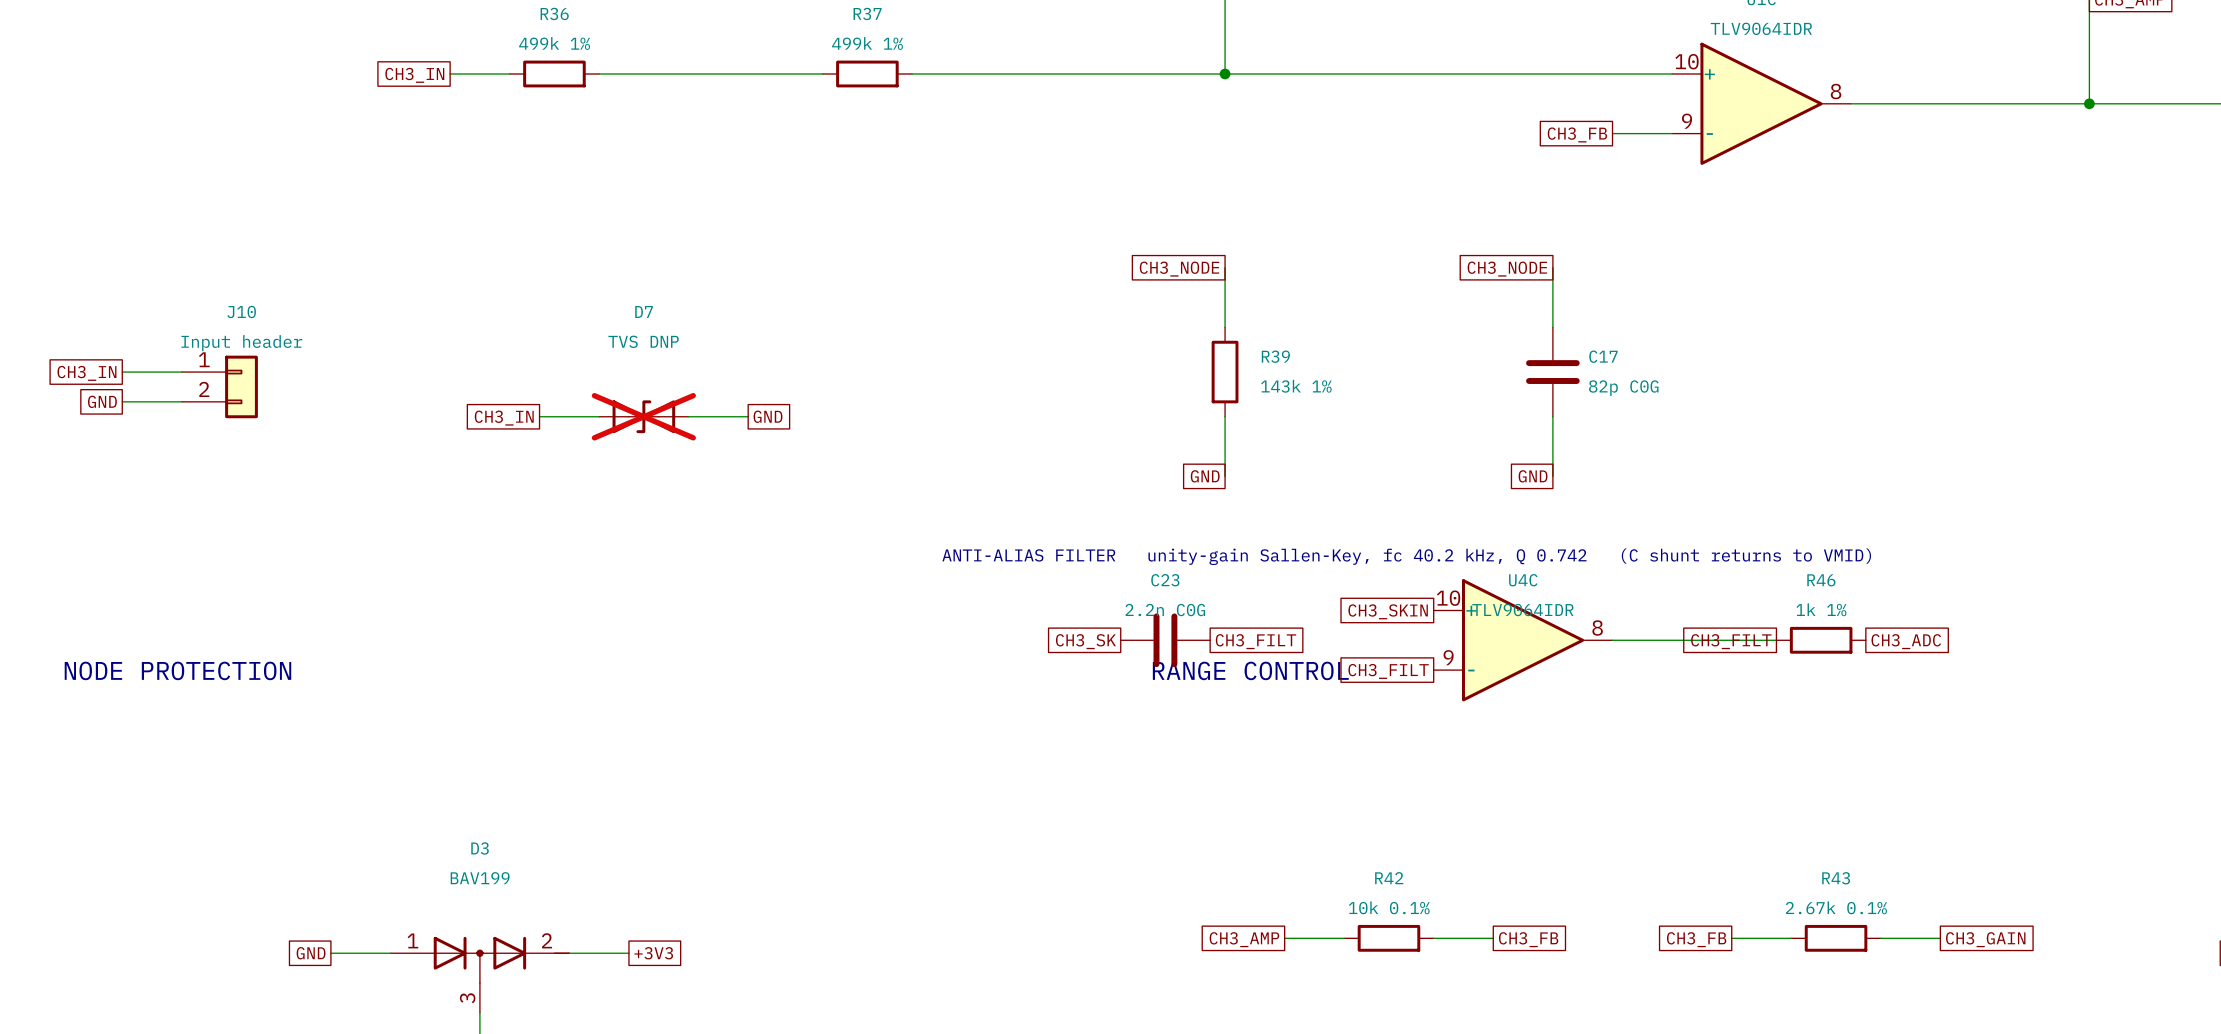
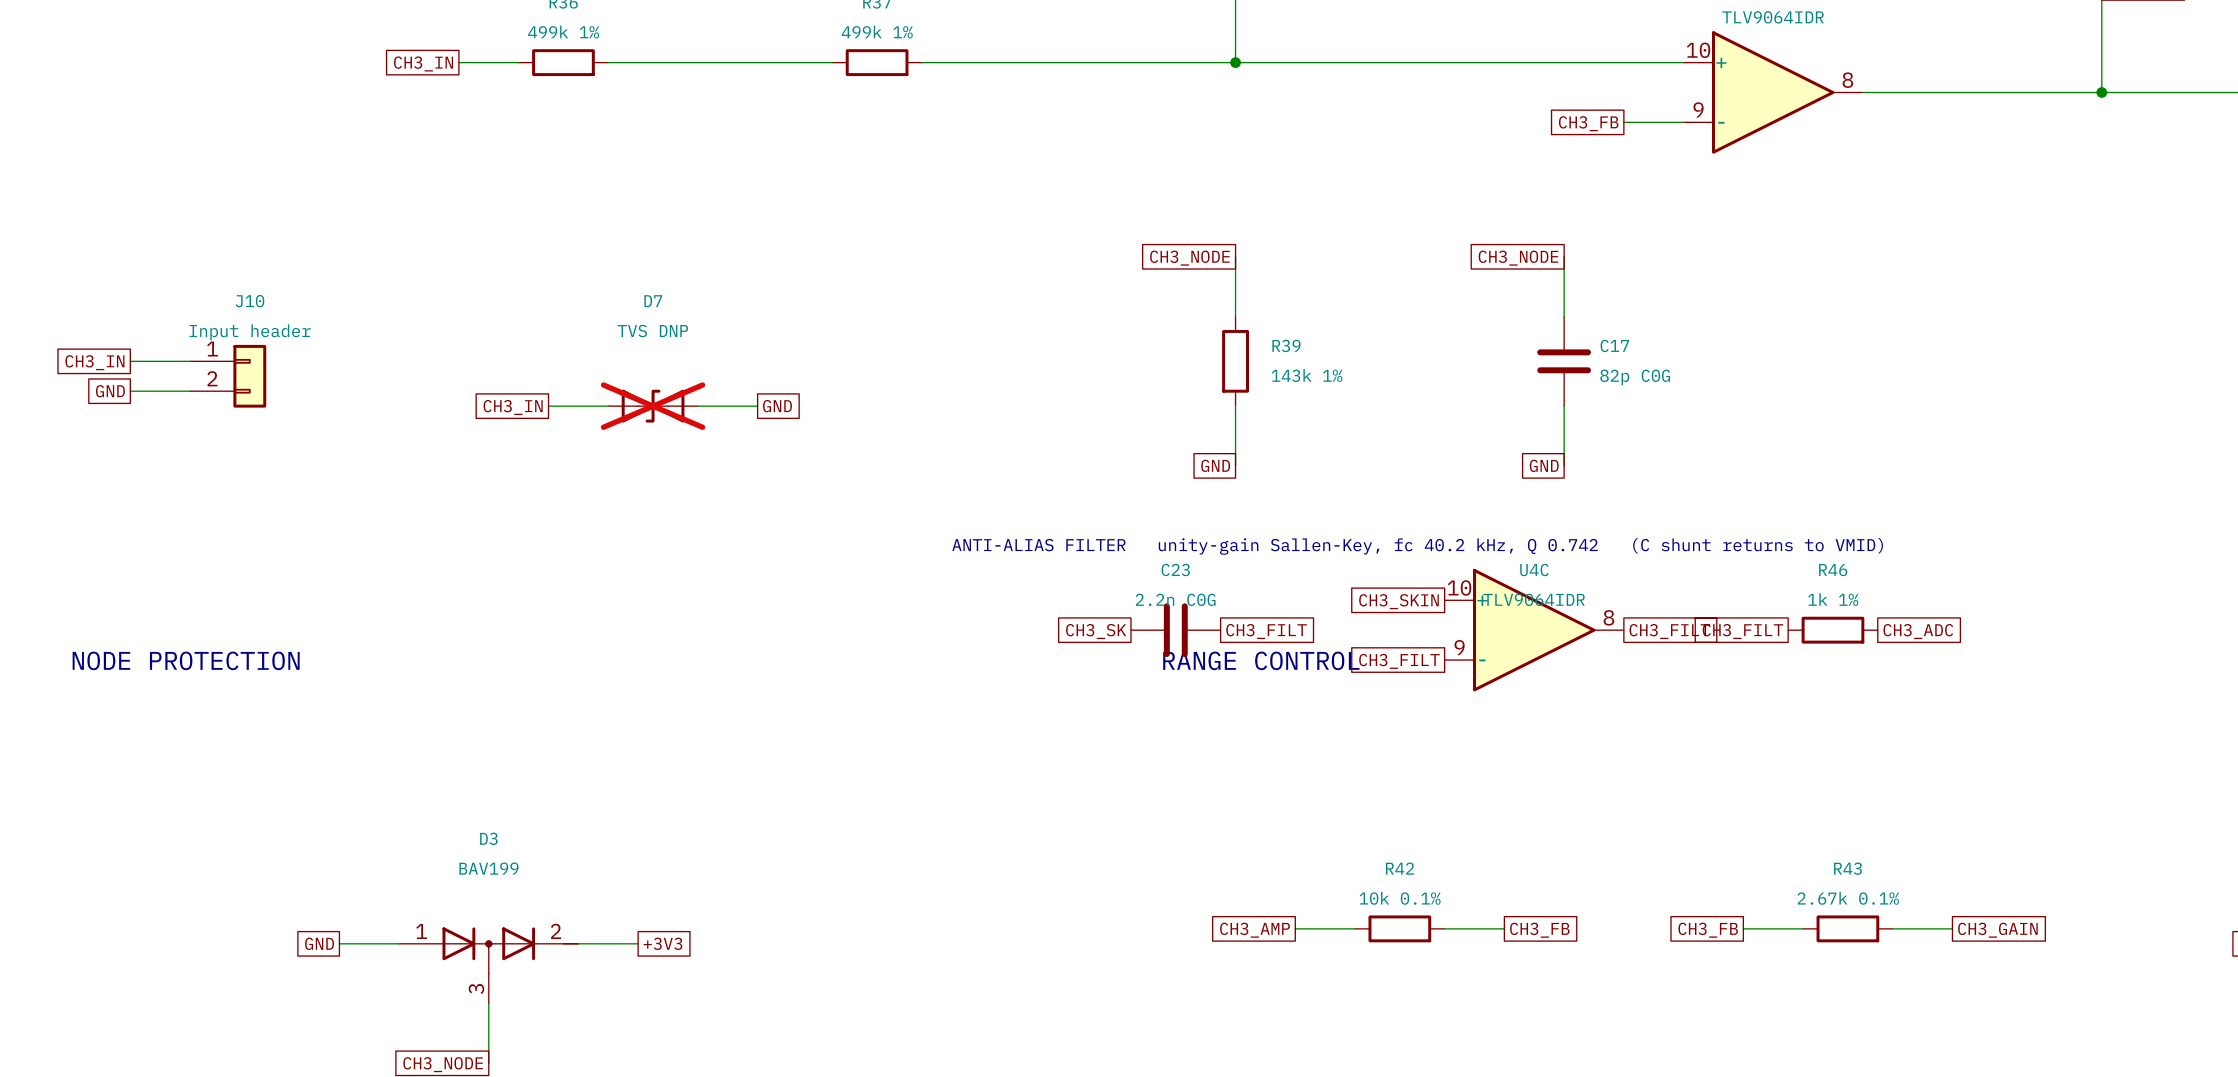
wire: (1612, 640) (1776, 640) -> none
global label: none -> CH3_FILT (1669, 631)

